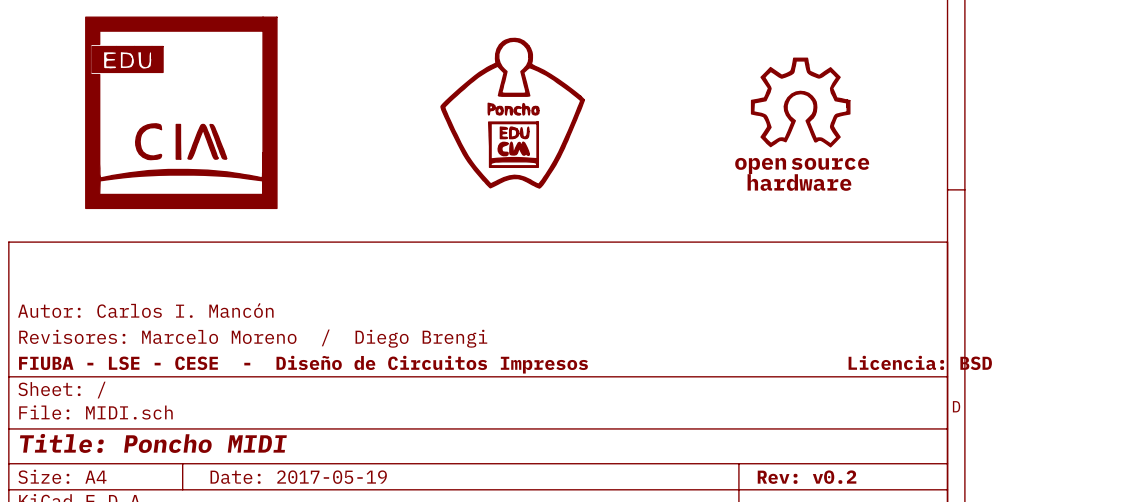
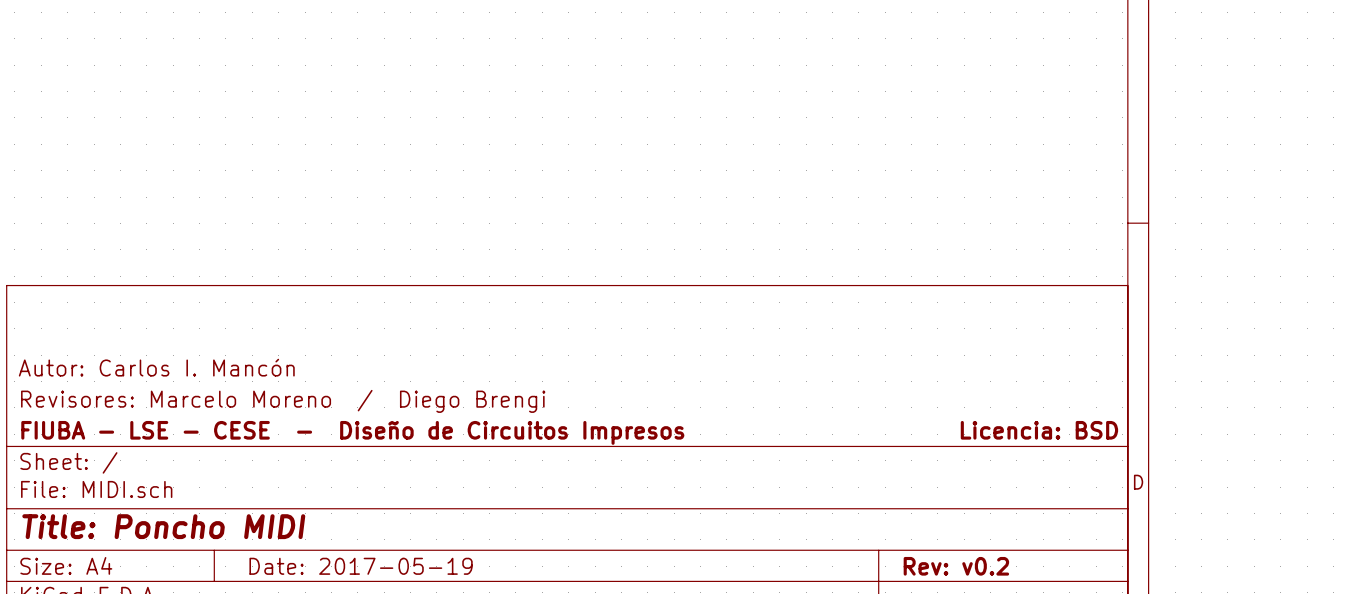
part: (800, 102) -> none
part: (181, 112) -> none
part: (512, 113) -> none

